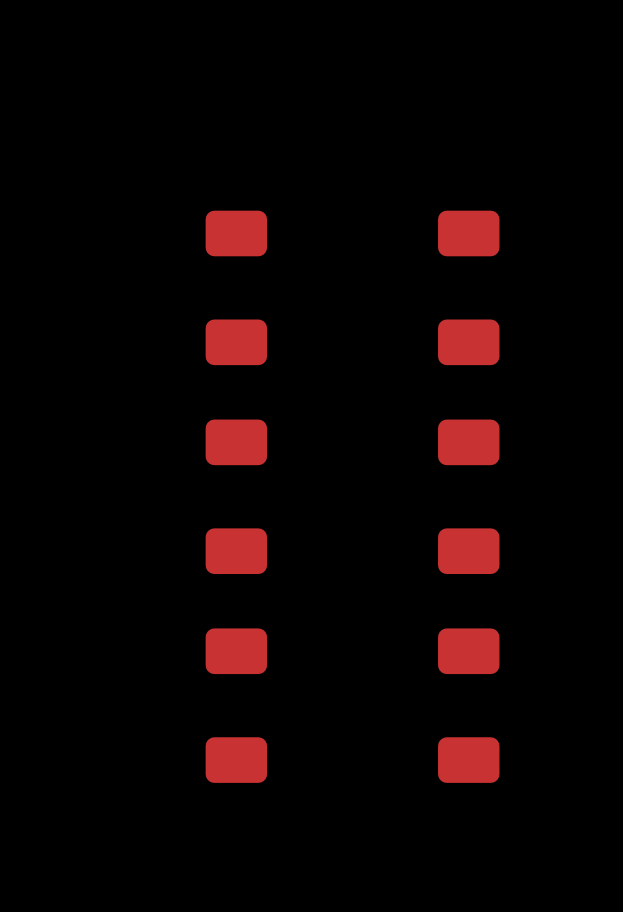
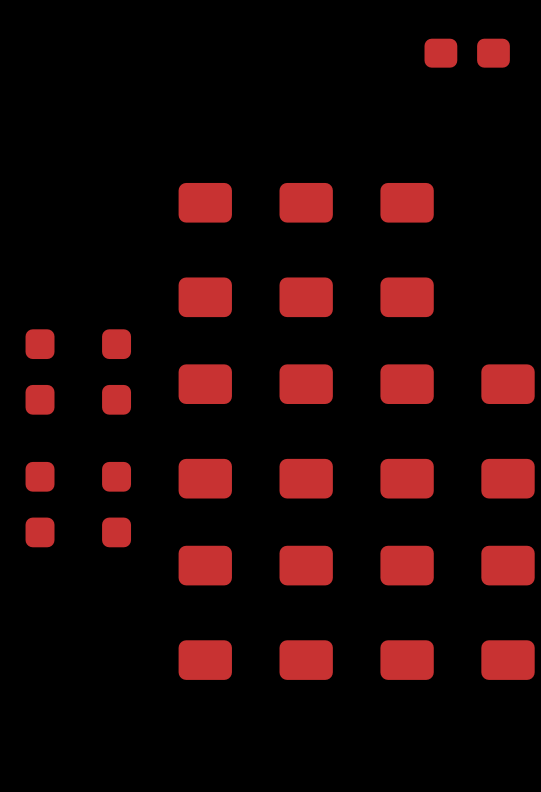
part: none -> (467, 53)
part: none -> (306, 250)
part: none -> (40, 371)
part: none -> (116, 371)
part: none -> (306, 431)
part: none -> (508, 431)
part: none -> (40, 504)
part: none -> (116, 504)
part: none -> (306, 612)
part: none -> (508, 612)

